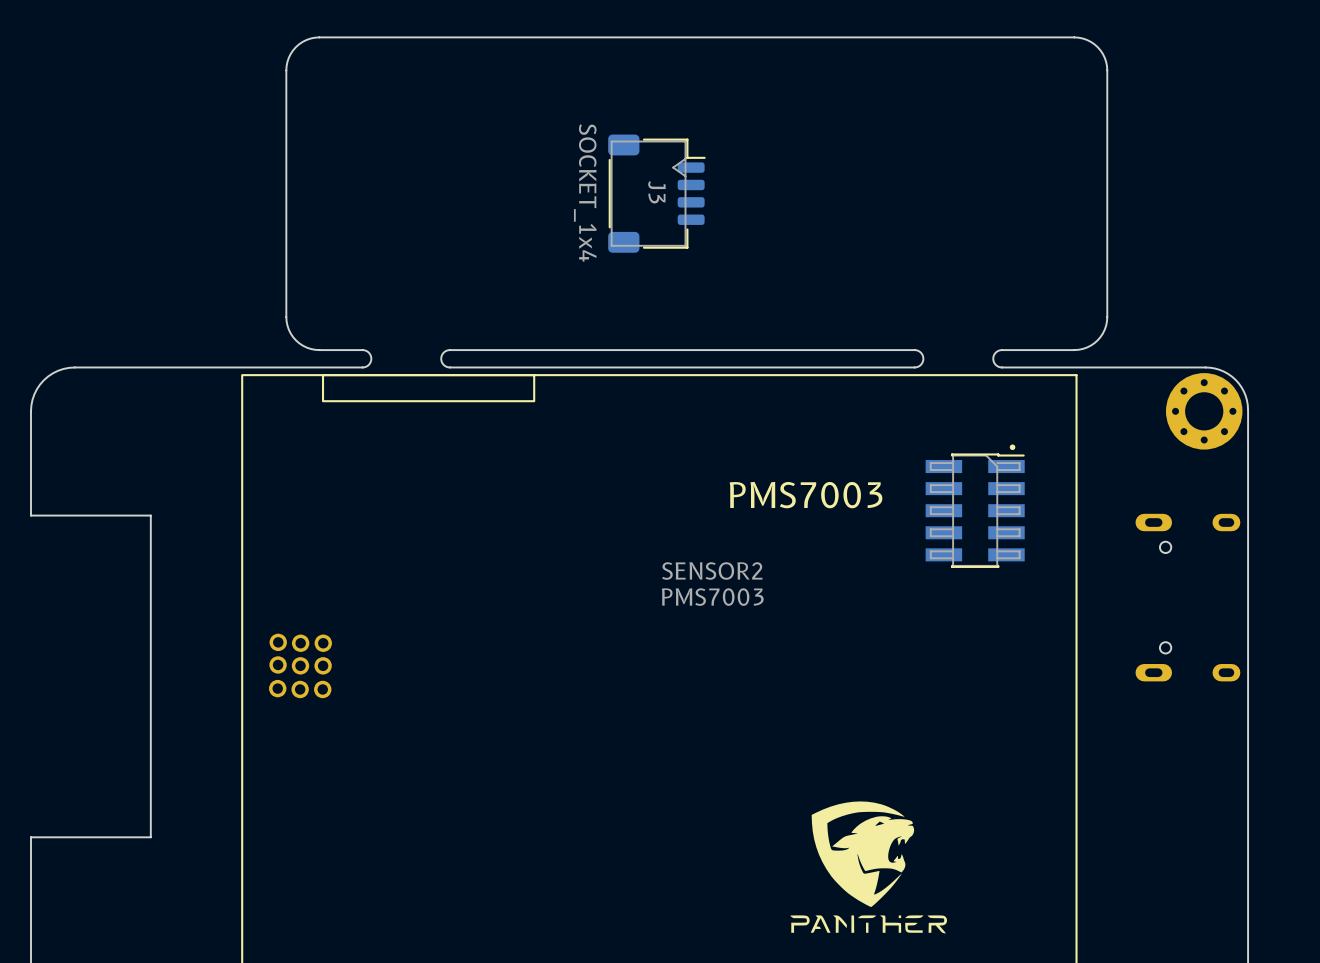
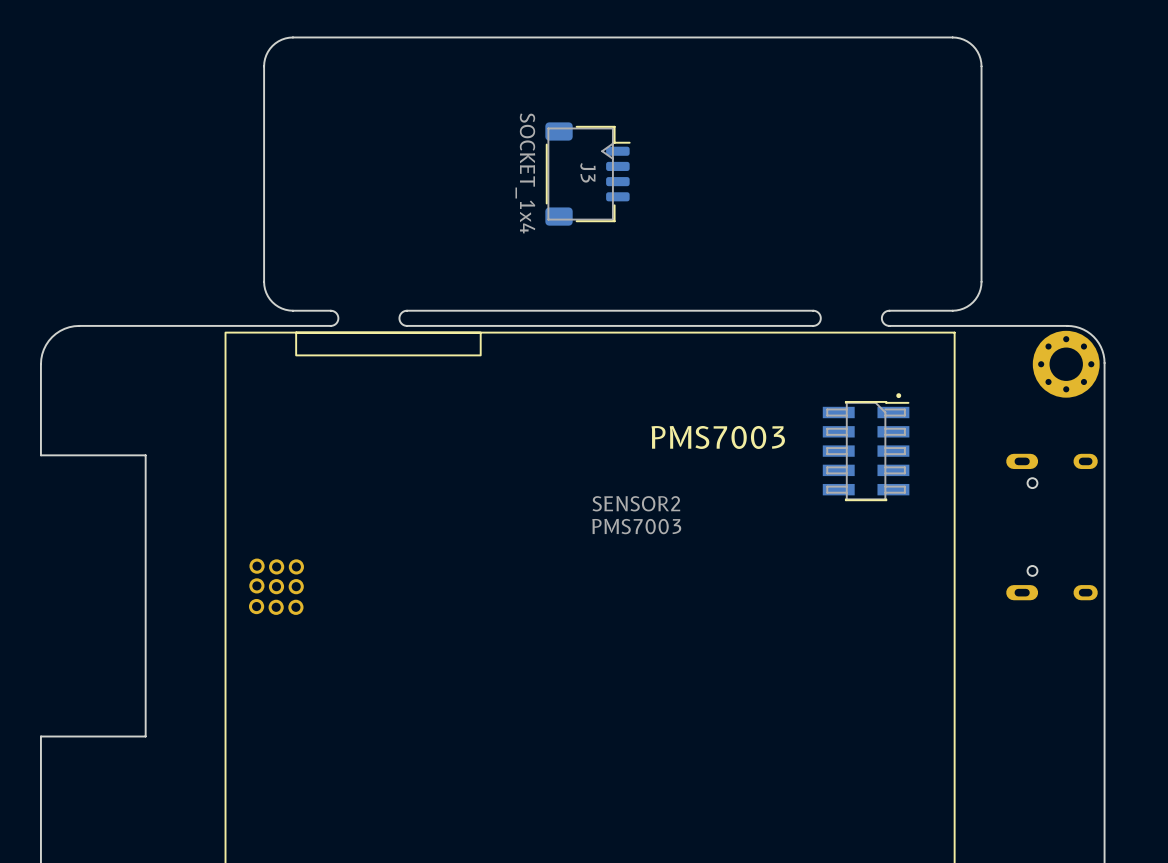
drawing: [790, 801, 948, 934] -> none

